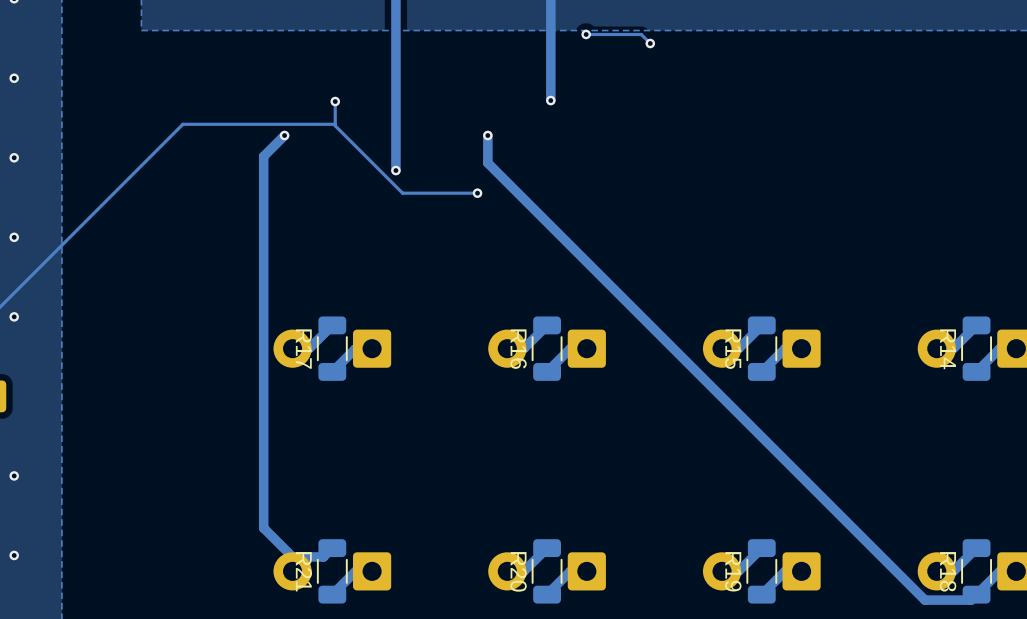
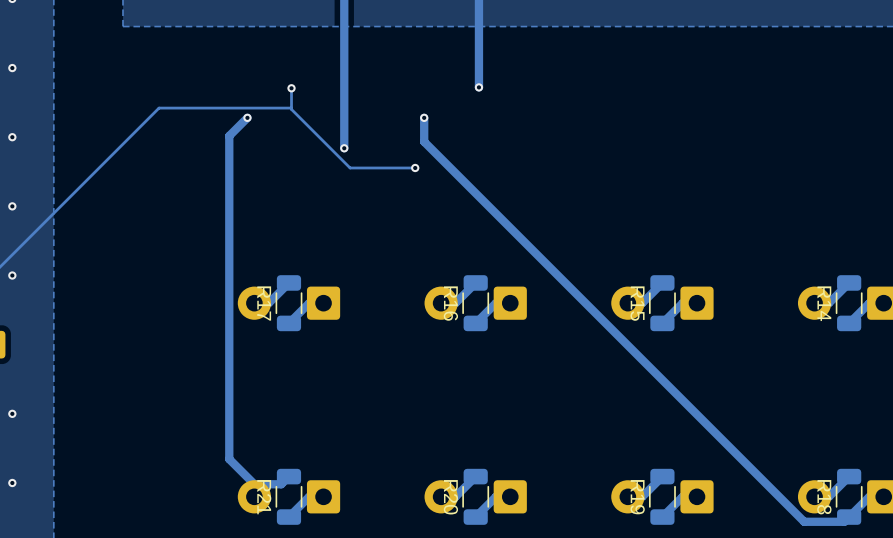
track: (586, 34) (641, 34) (650, 43) -> none
via: (586, 34) -> none
via: (650, 43) -> none

